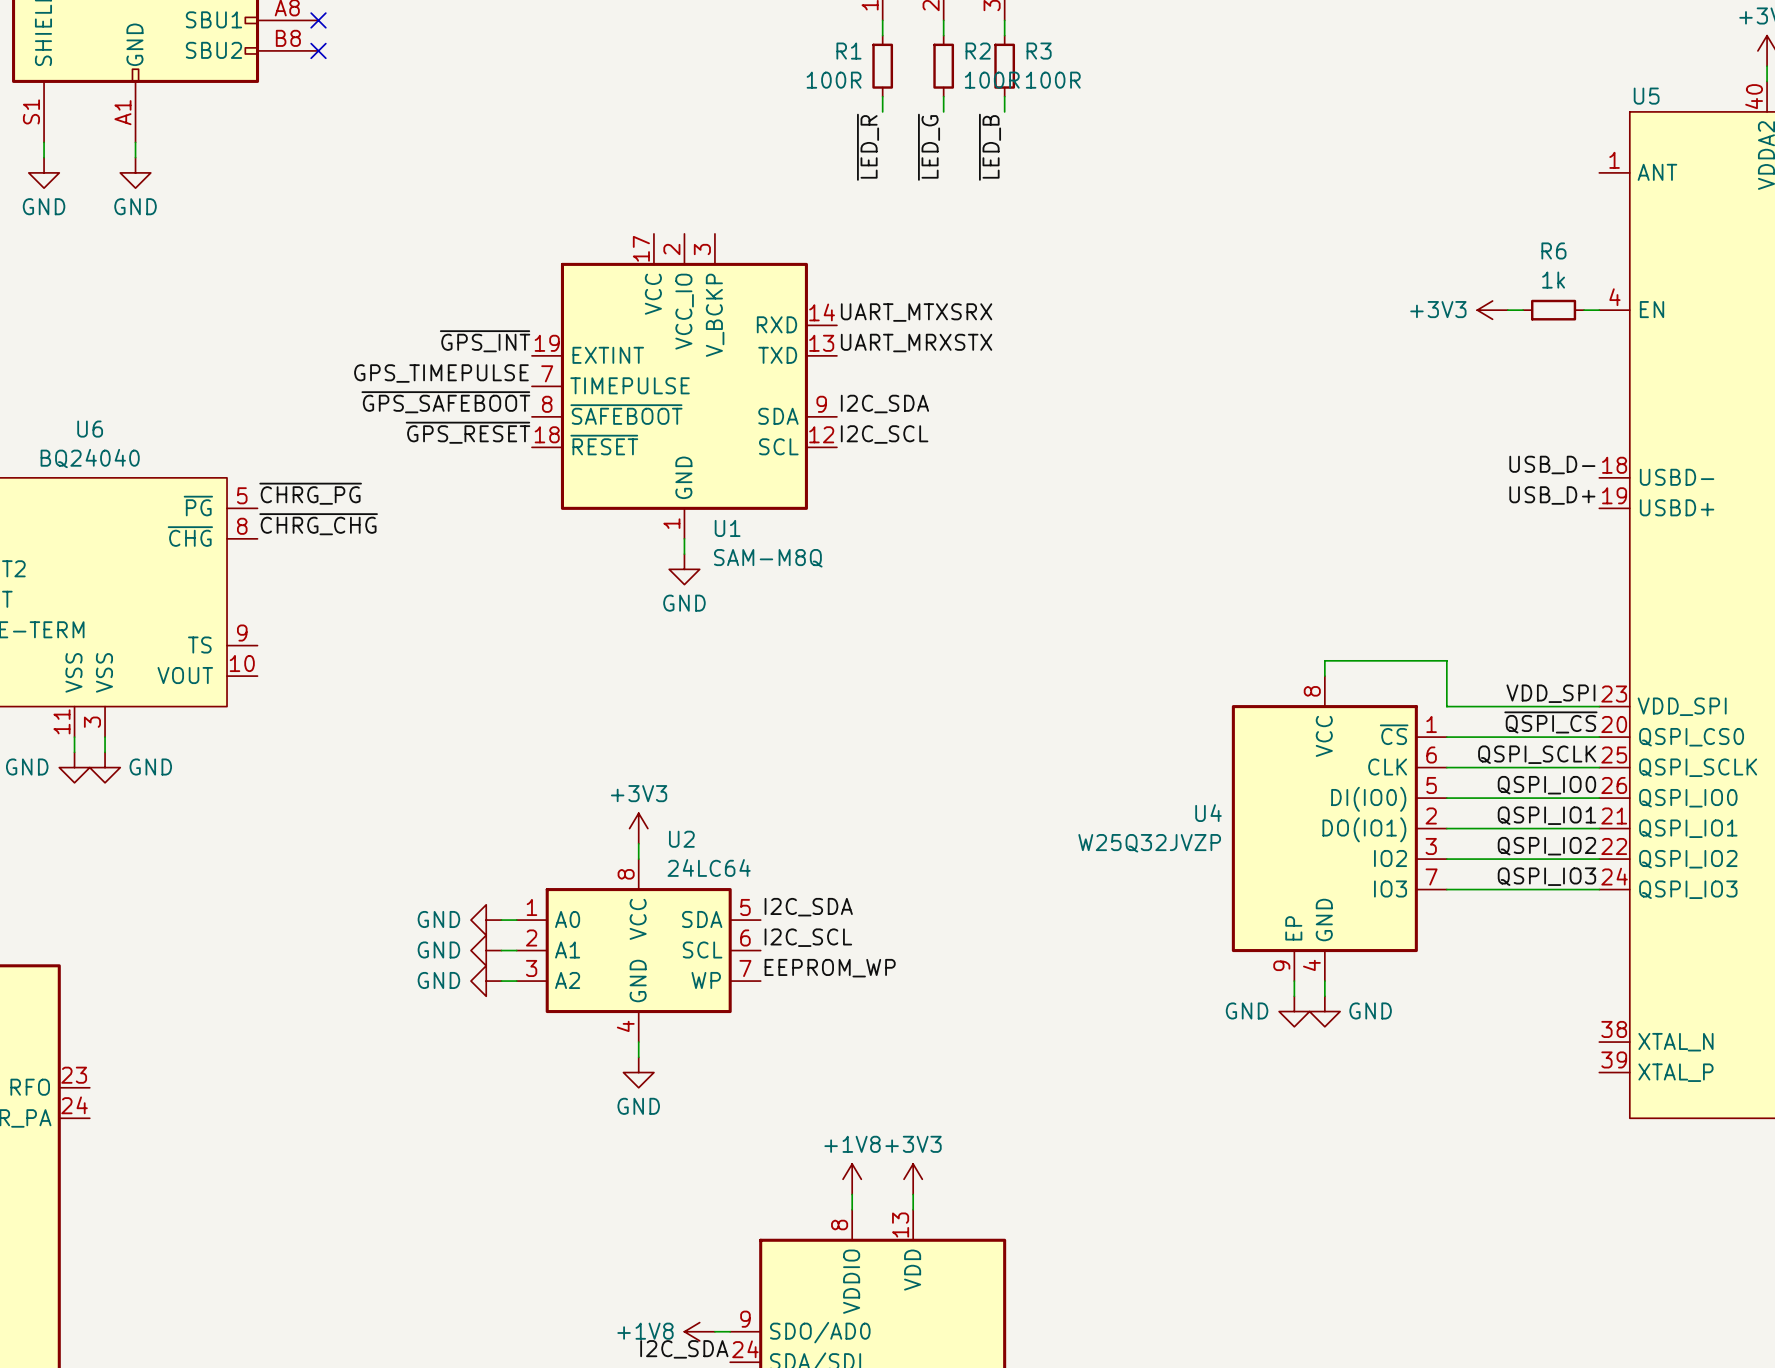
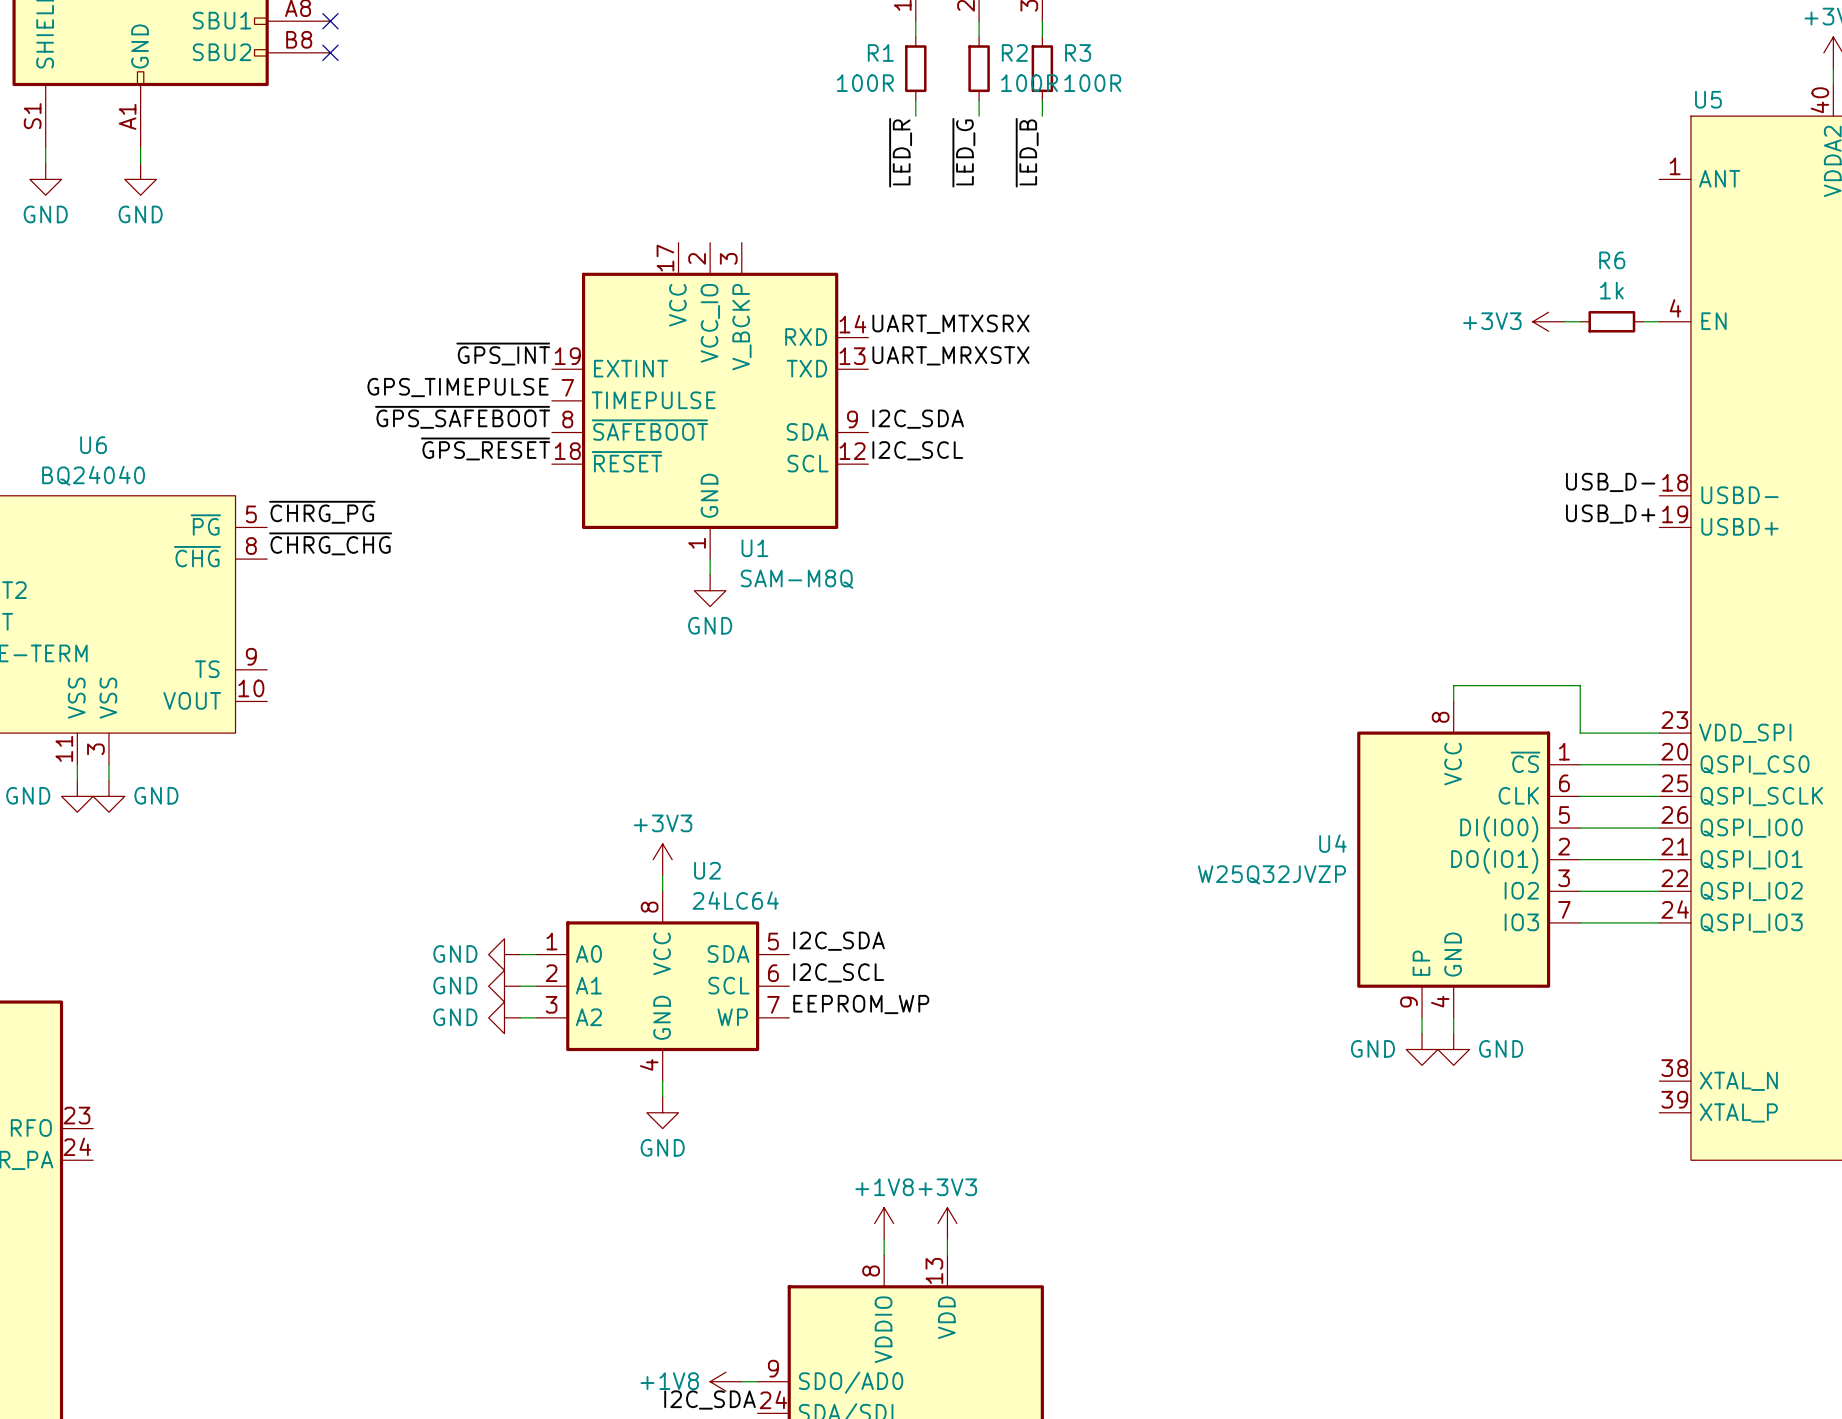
wire: (1401, 660) (1324, 660) (1324, 676) -> (1453, 685) (1453, 701)
wire: (1446, 660) (1446, 706) (1523, 706) -> (1501, 685) (1580, 685) (1580, 733)
label: VDD_SPI (1550, 693) -> none
label: ~{QSPI_CS} (1550, 722) -> none
label: QSPI_SCLK (1537, 754) -> none
label: QSPI_IO0 (1546, 785) -> none
label: QSPI_IO1 (1546, 815) -> none
U4 position: (1339, 828) -> (1468, 859)
label: QSPI_IO2 (1546, 846) -> none
label: QSPI_IO3 (1546, 876) -> none
wire: (1294, 981) (1294, 996) -> (1422, 1017) (1422, 1033)
wire: (1324, 981) (1324, 996) -> (1453, 1017) (1453, 1033)
power symbol: GND (1294, 1011) -> none
power symbol: GND (1324, 1011) -> none
power symbol: none -> GND (1422, 1049)
power symbol: none -> GND (1453, 1049)

